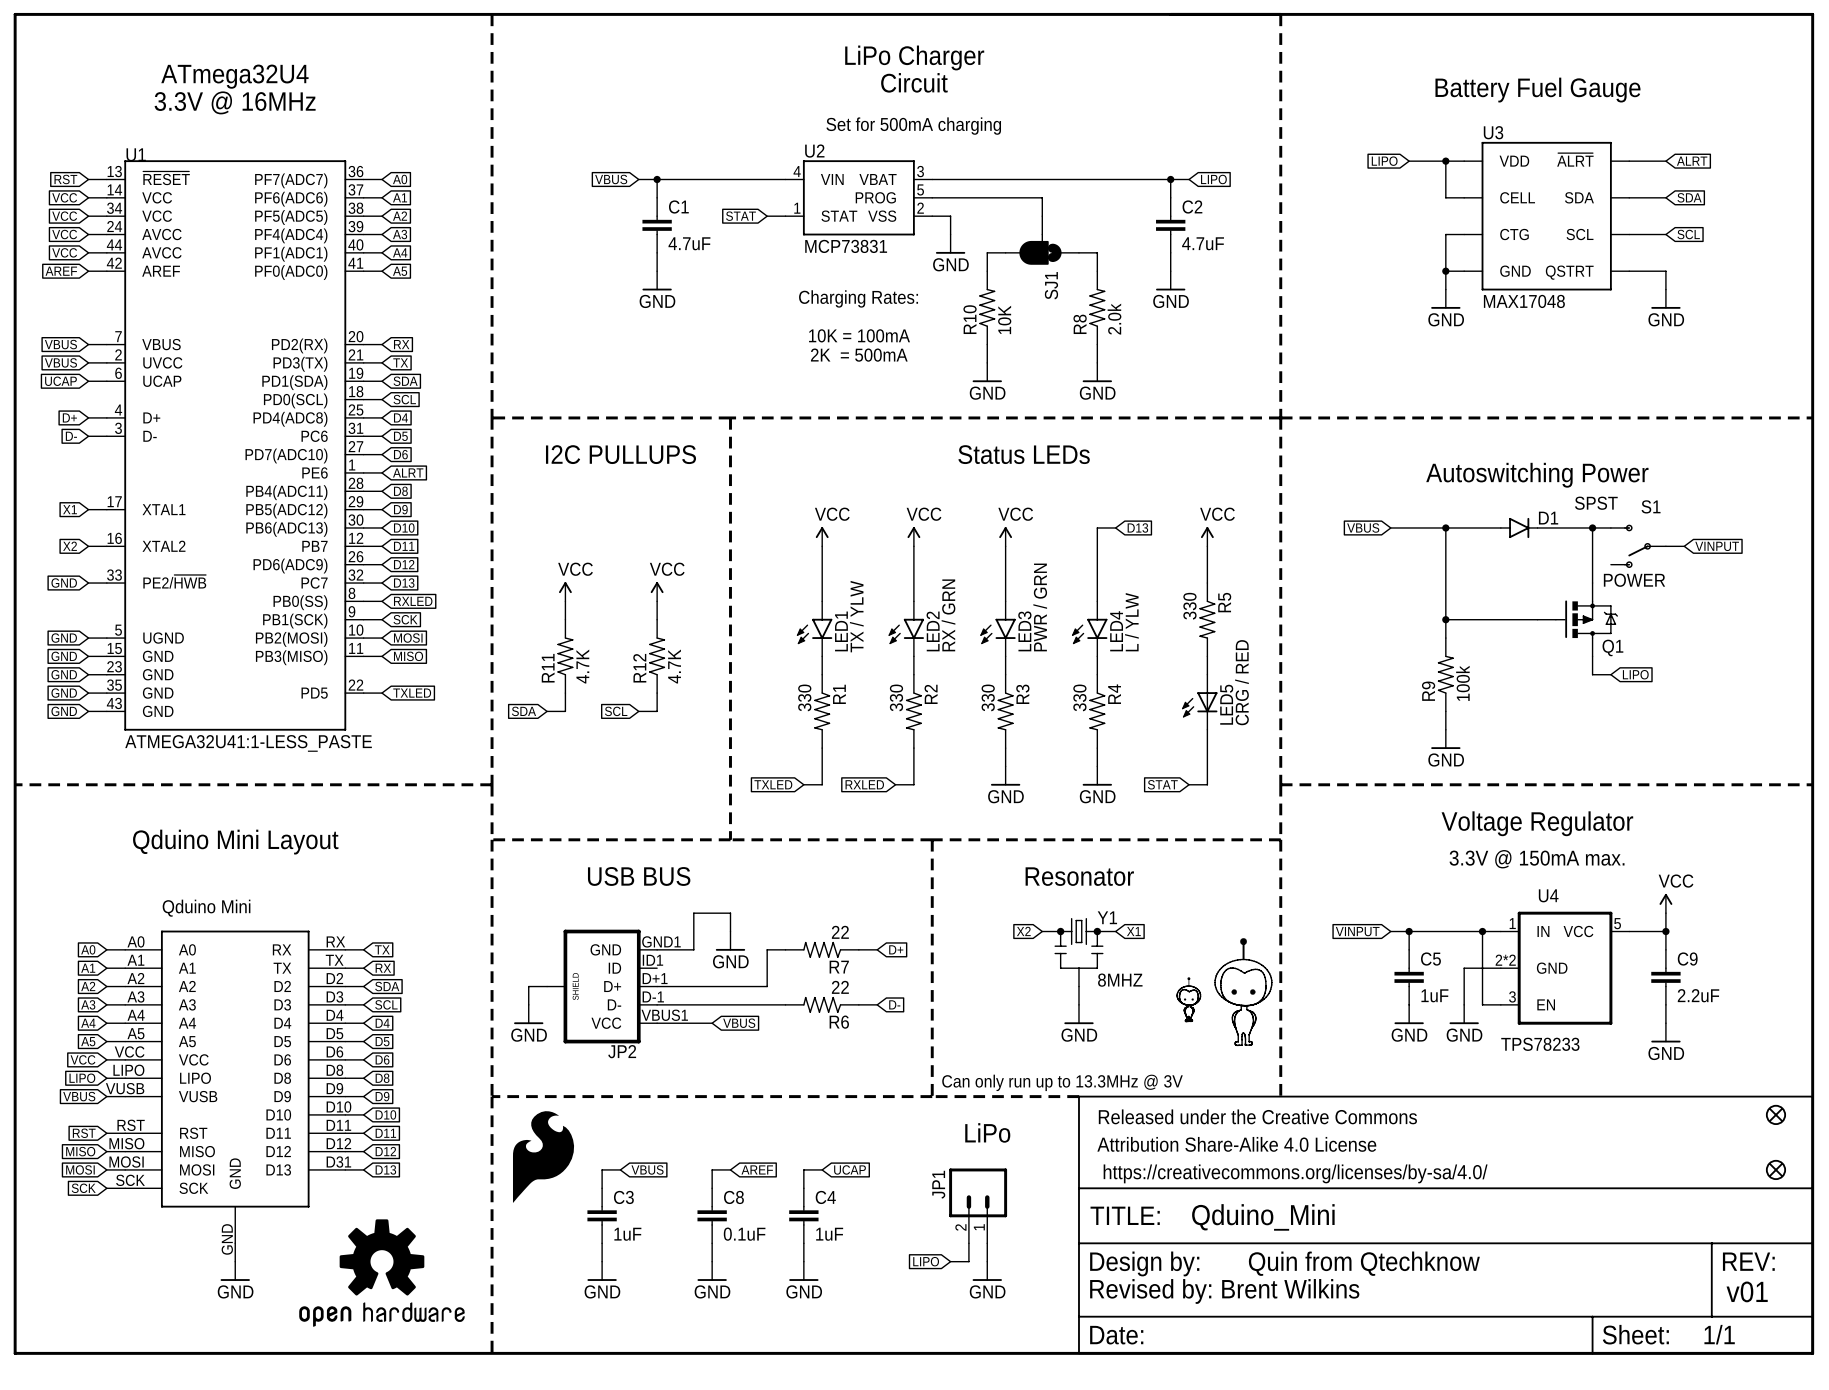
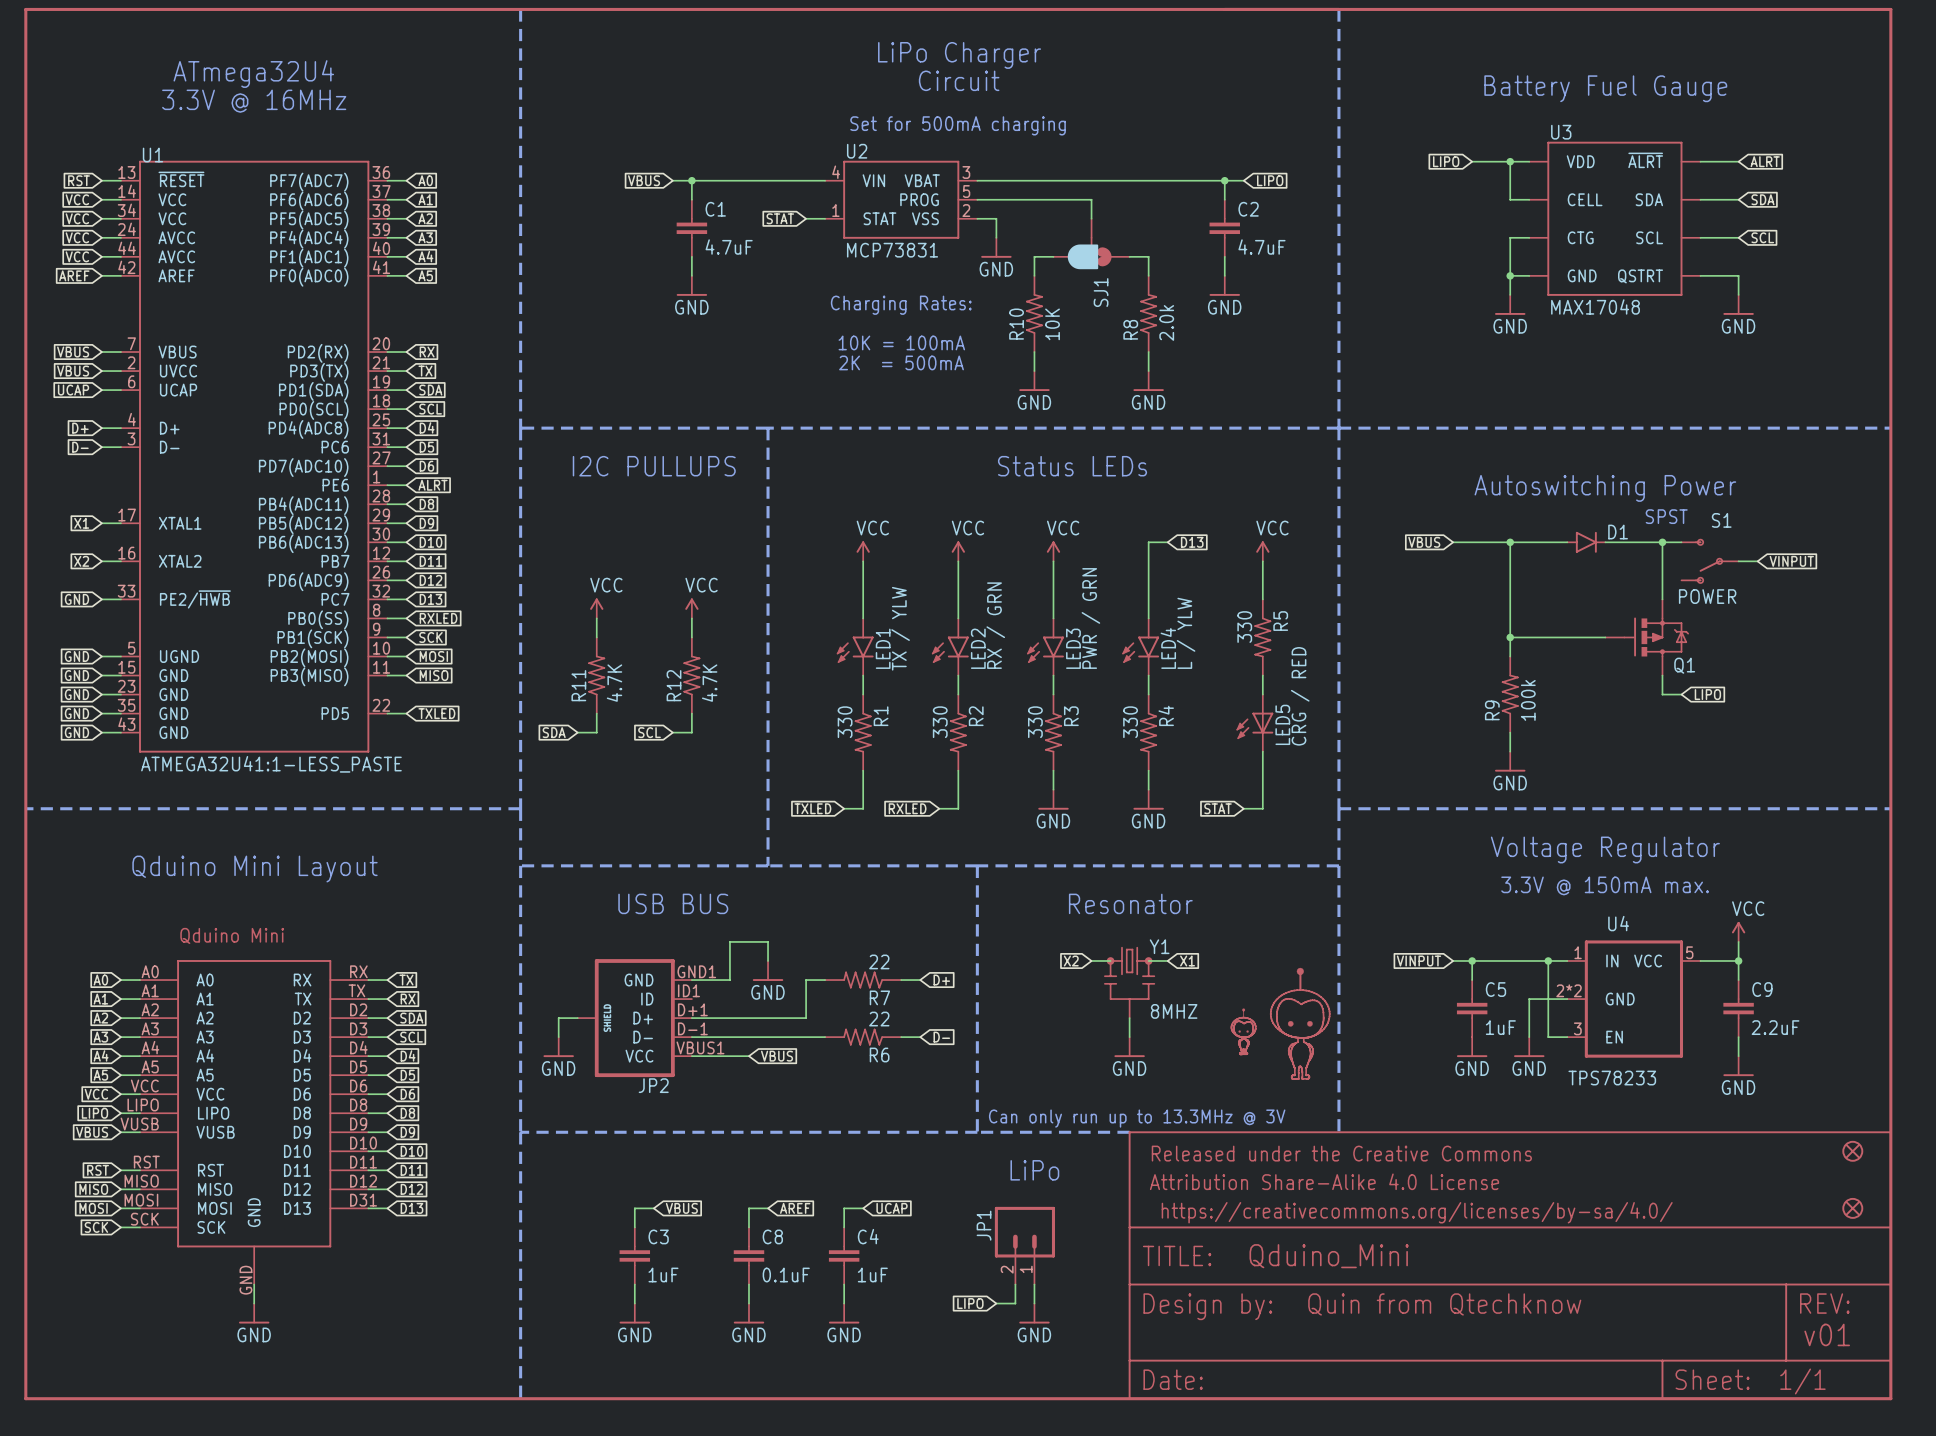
part: (543, 1157) -> none
part: (381, 1273) -> none
text: Revised by: Brent Wilkins (1224, 1291) -> none

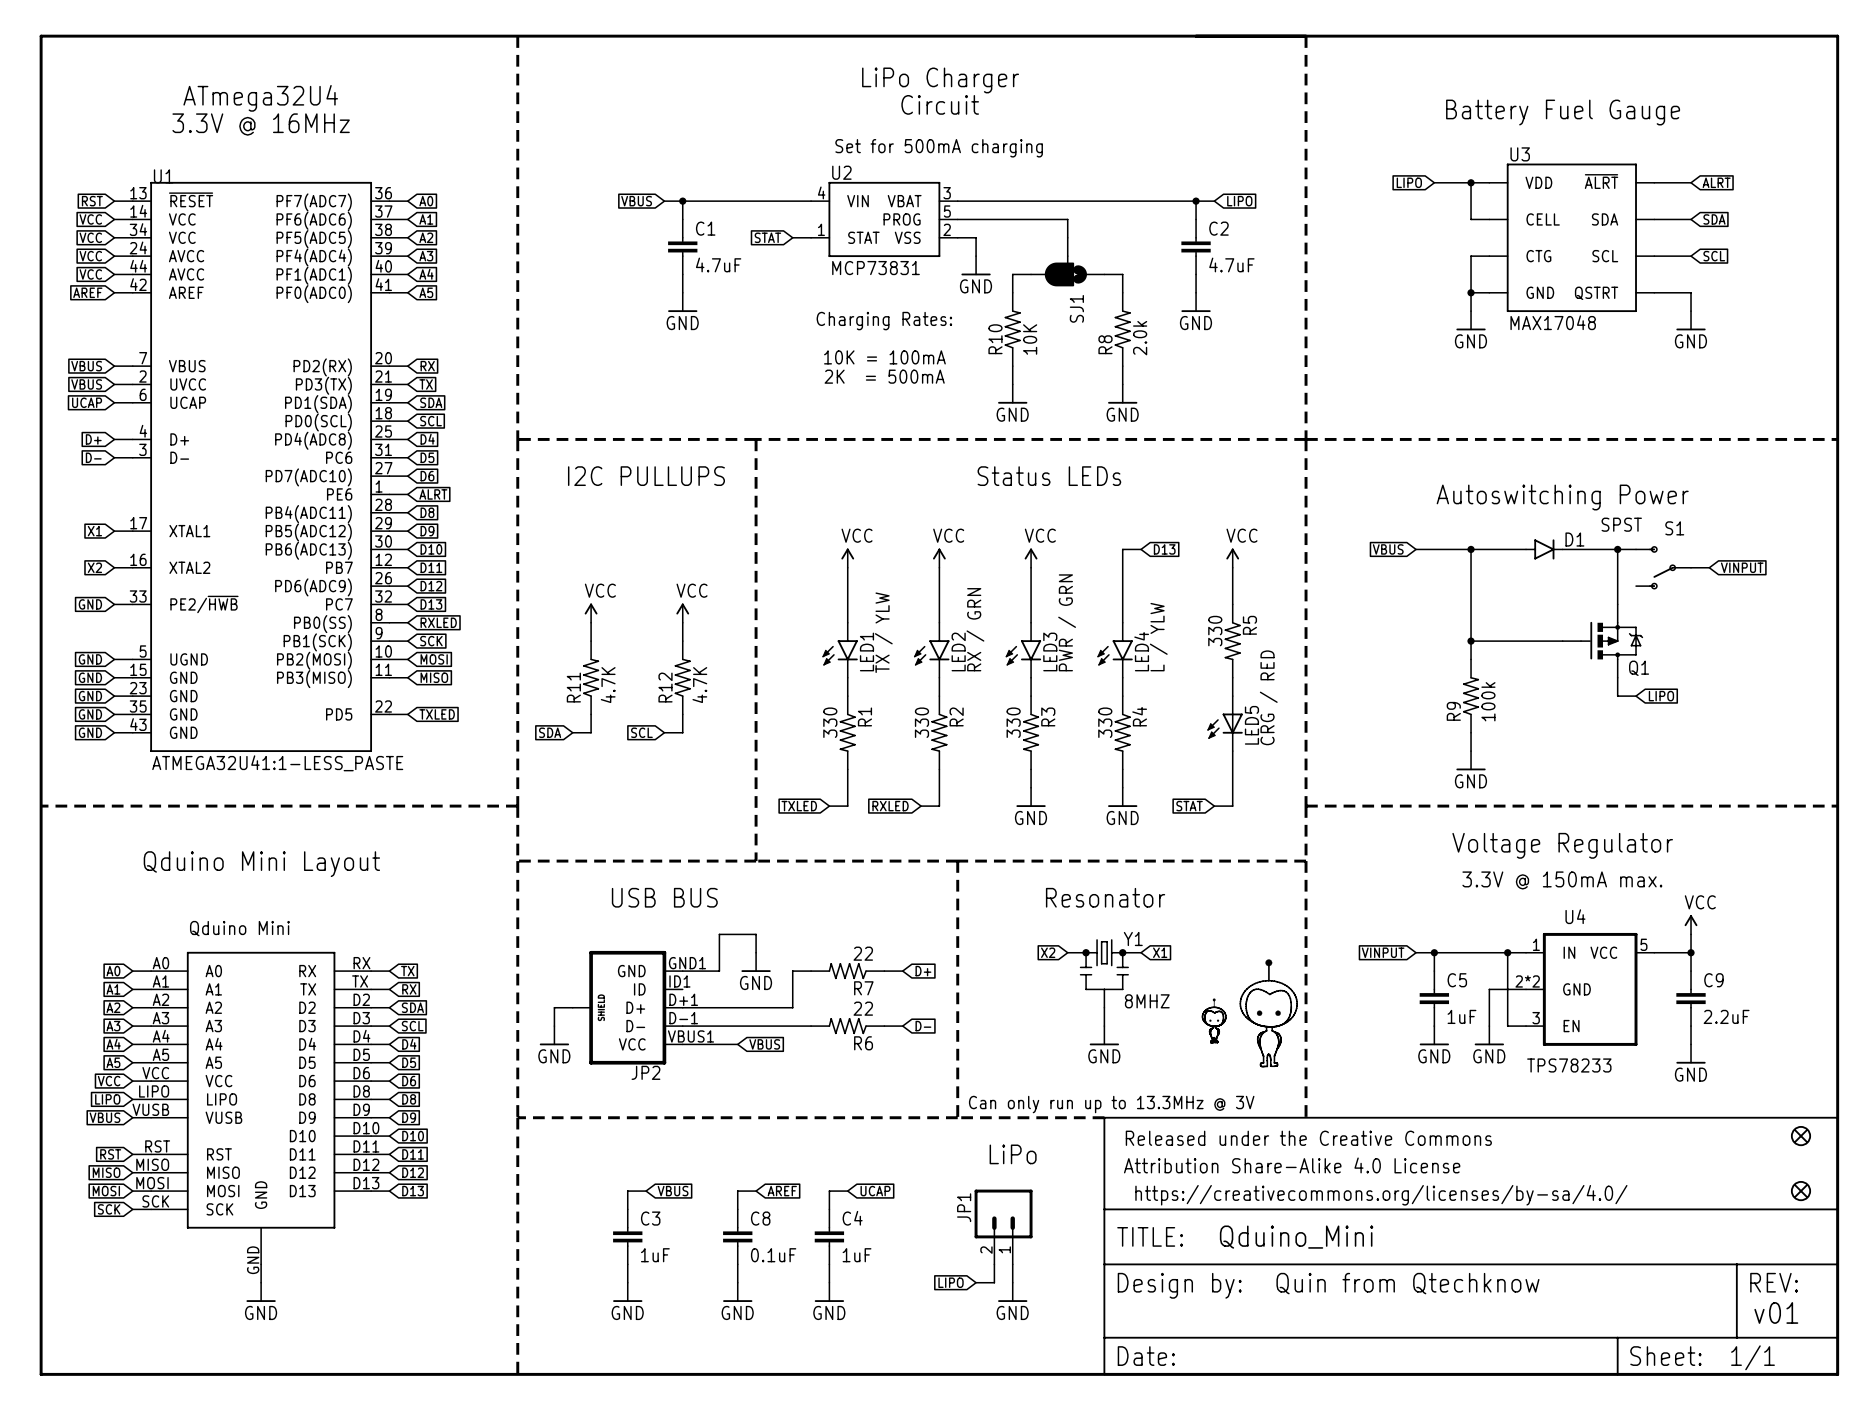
S1 value: POWER (1707, 596) -> none
part pin number: D31 (363, 1200) -> D13 (366, 1183)

